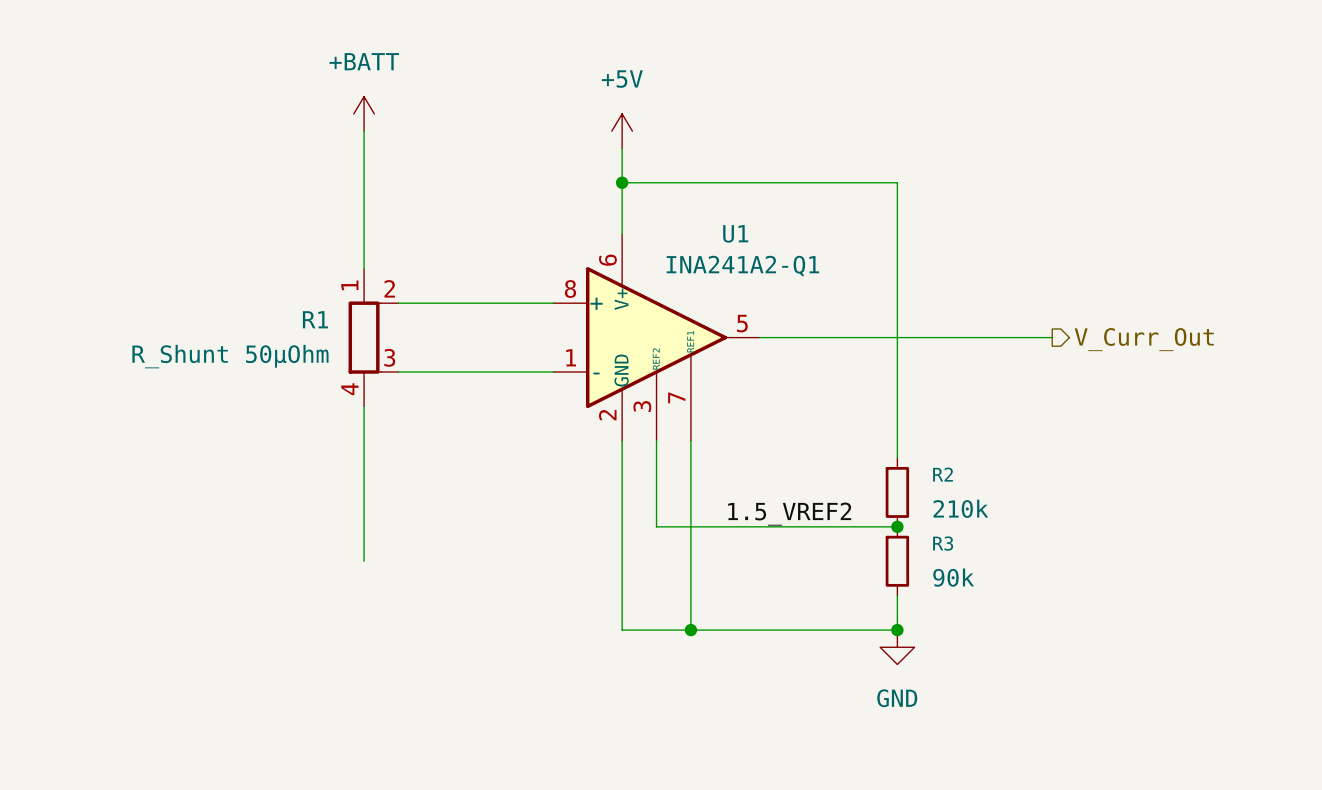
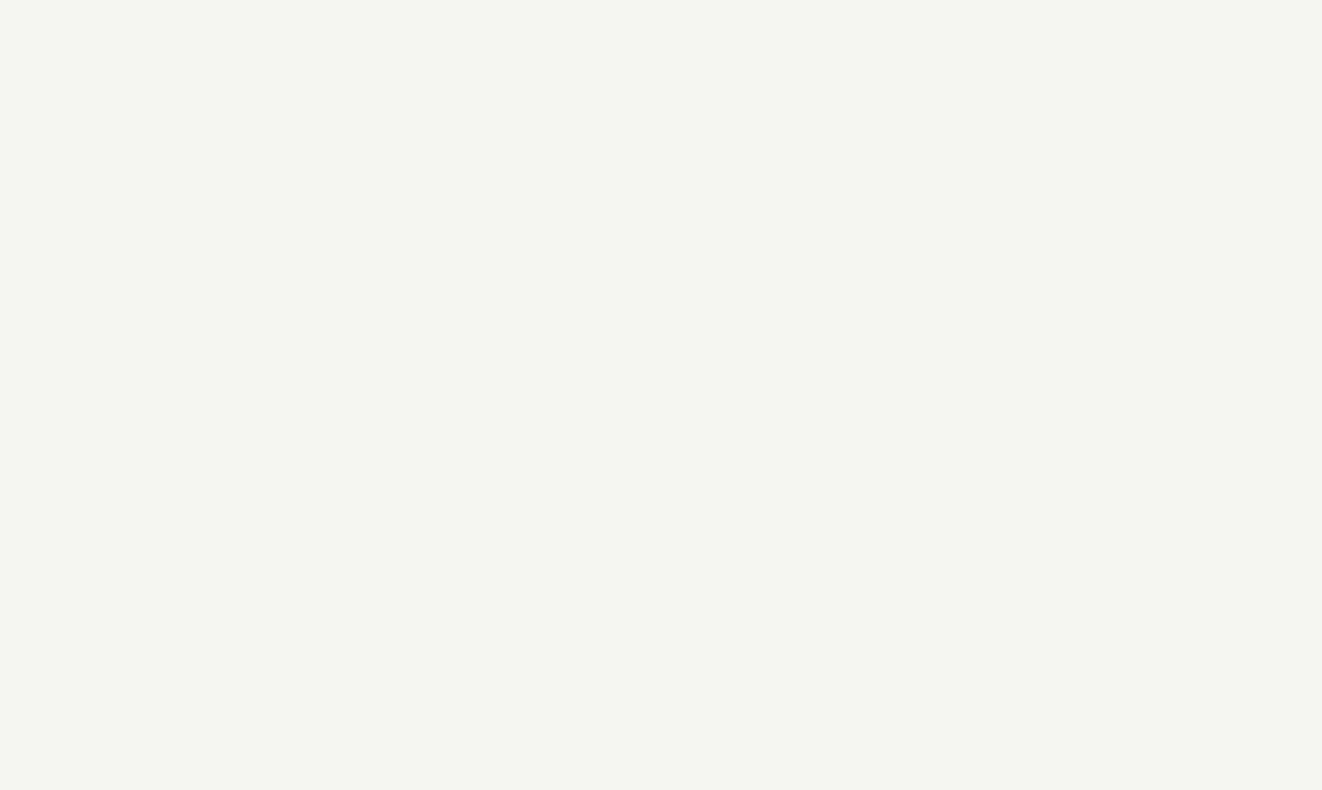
power symbol: +BATT (364, 113) -> none
wire: (364, 131) (364, 268) -> none
power symbol: +5V (622, 131) -> none
wire: (622, 148) (622, 234) -> none
wire: (622, 182) (897, 182) (897, 458) -> none
junction: (622, 182) -> none
wire: (398, 303) (553, 303) -> none
R1: R_Shunt 50µOhm (373, 337) -> none
U1: INA241A2-Q1 (656, 337) -> none
wire: (759, 337) (1052, 337) -> none
hierarchical label: V_Curr_Out (1144, 339) -> none
wire: (398, 372) (553, 372) -> none
wire: (364, 406) (364, 561) -> none
wire: (622, 440) (622, 630) (897, 630) (897, 595) -> none
wire: (656, 440) (656, 526) (897, 526) -> none
wire: (690, 440) (690, 630) -> none
R2: 210k (897, 492) -> none
label: 1.5_VREF2 (789, 514) -> none
junction: (897, 526) -> none
R3: 90k (897, 561) -> none
junction: (690, 630) -> none
junction: (897, 630) -> none
power symbol: GND (897, 647) -> none

